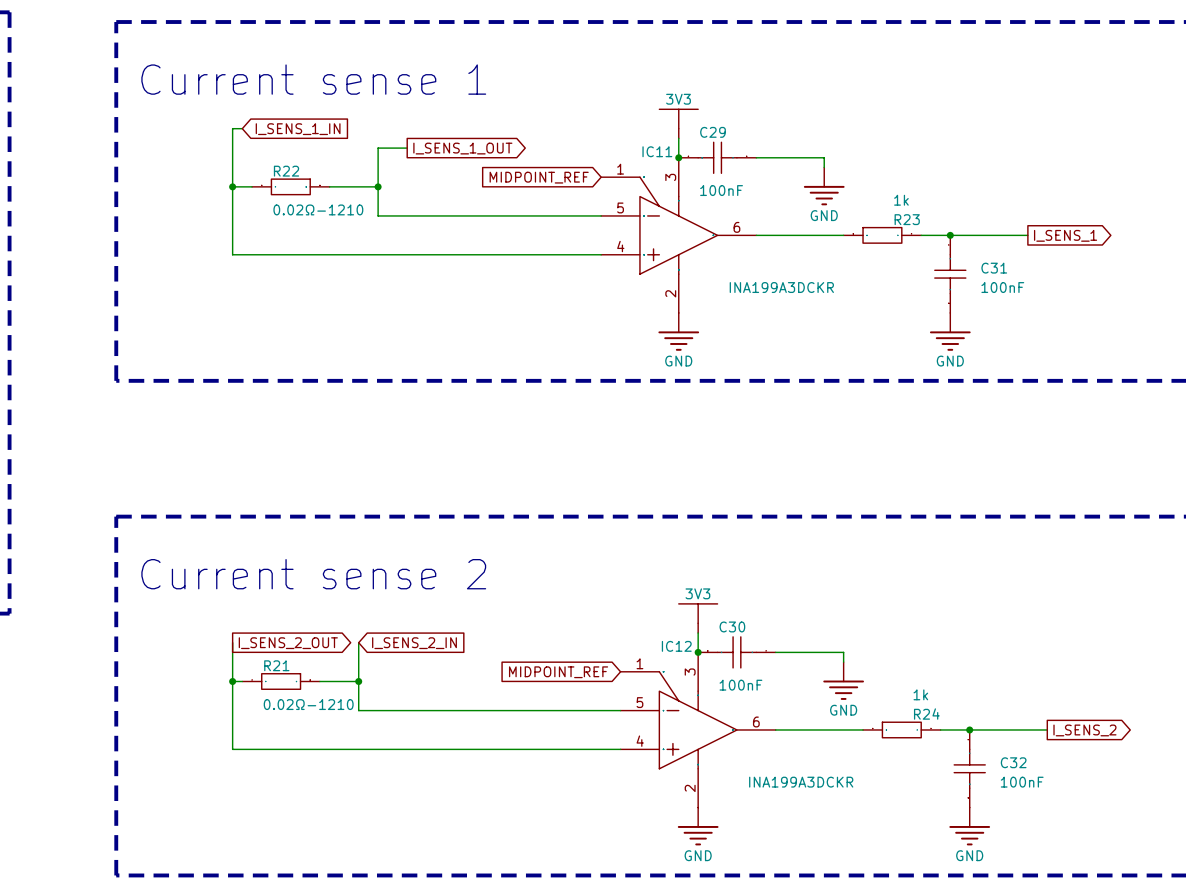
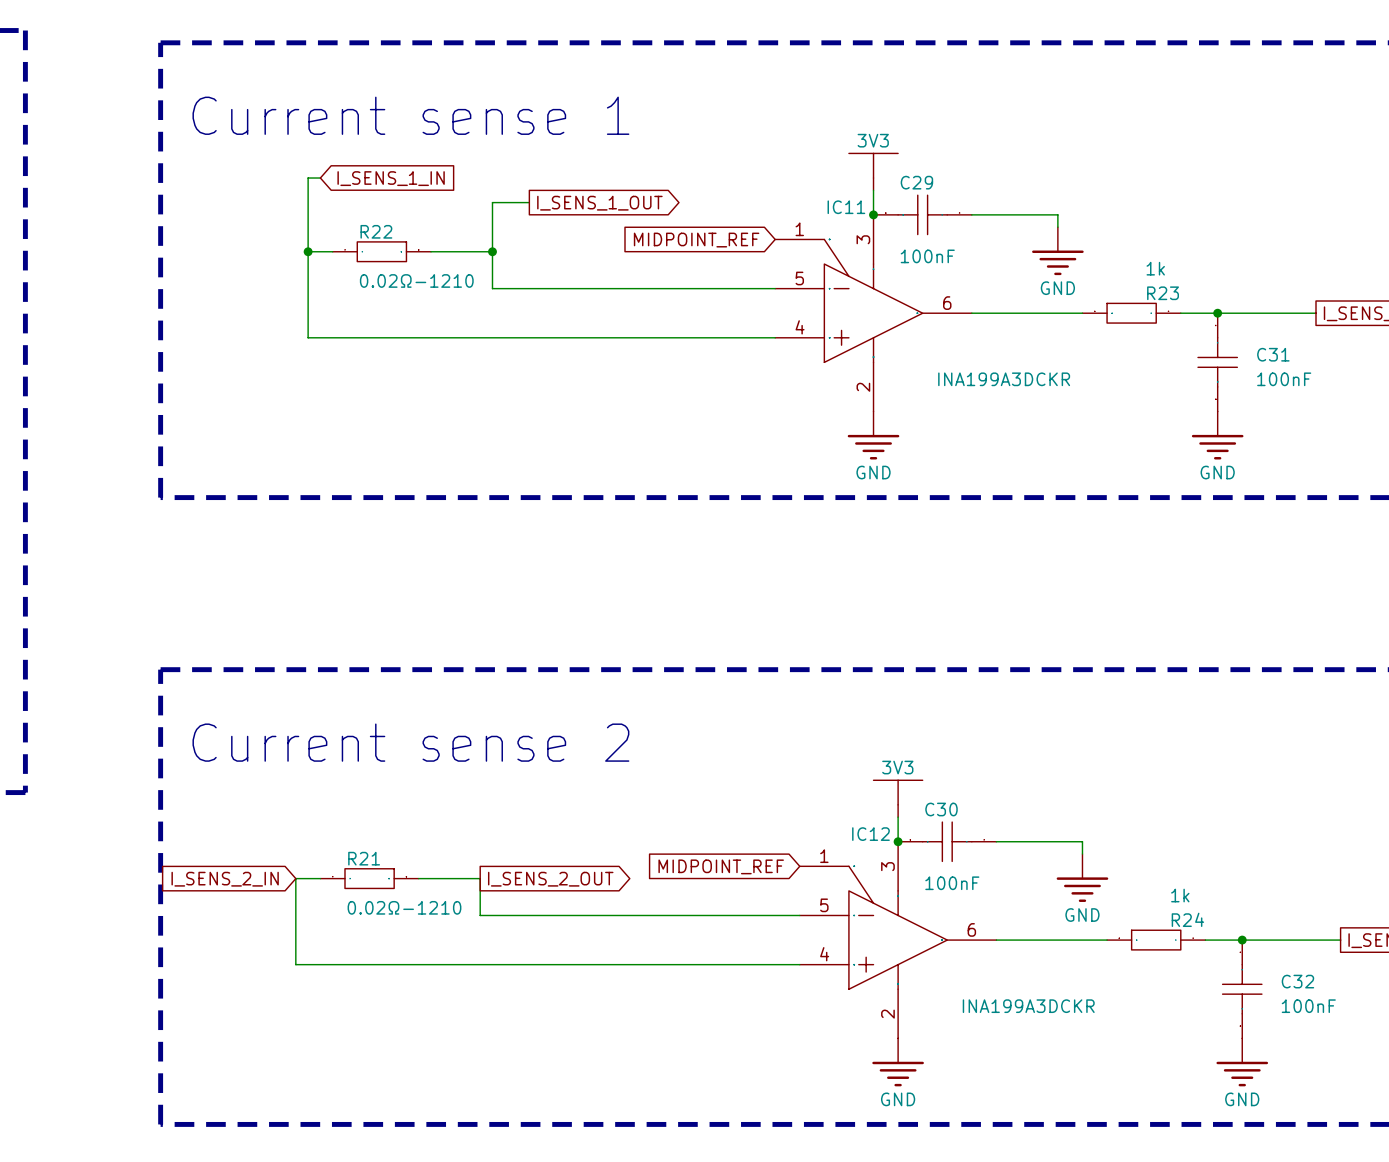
wire: (232, 642) (232, 749) -> (308, 878) (295, 878) (295, 964) (308, 964)
wire: (358, 642) (358, 710) (368, 710) -> (467, 878) (480, 878) (480, 915)
global label position: I_SENS_2_OUT (288, 643) -> I_SENS_2_OUT (550, 879)
global label rotation: 0° (414, 643) -> 180° (225, 879)
global label position: I_SENS_2_IN (414, 643) -> I_SENS_2_IN (225, 879)
junction: (232, 681) -> none
junction: (358, 681) -> none

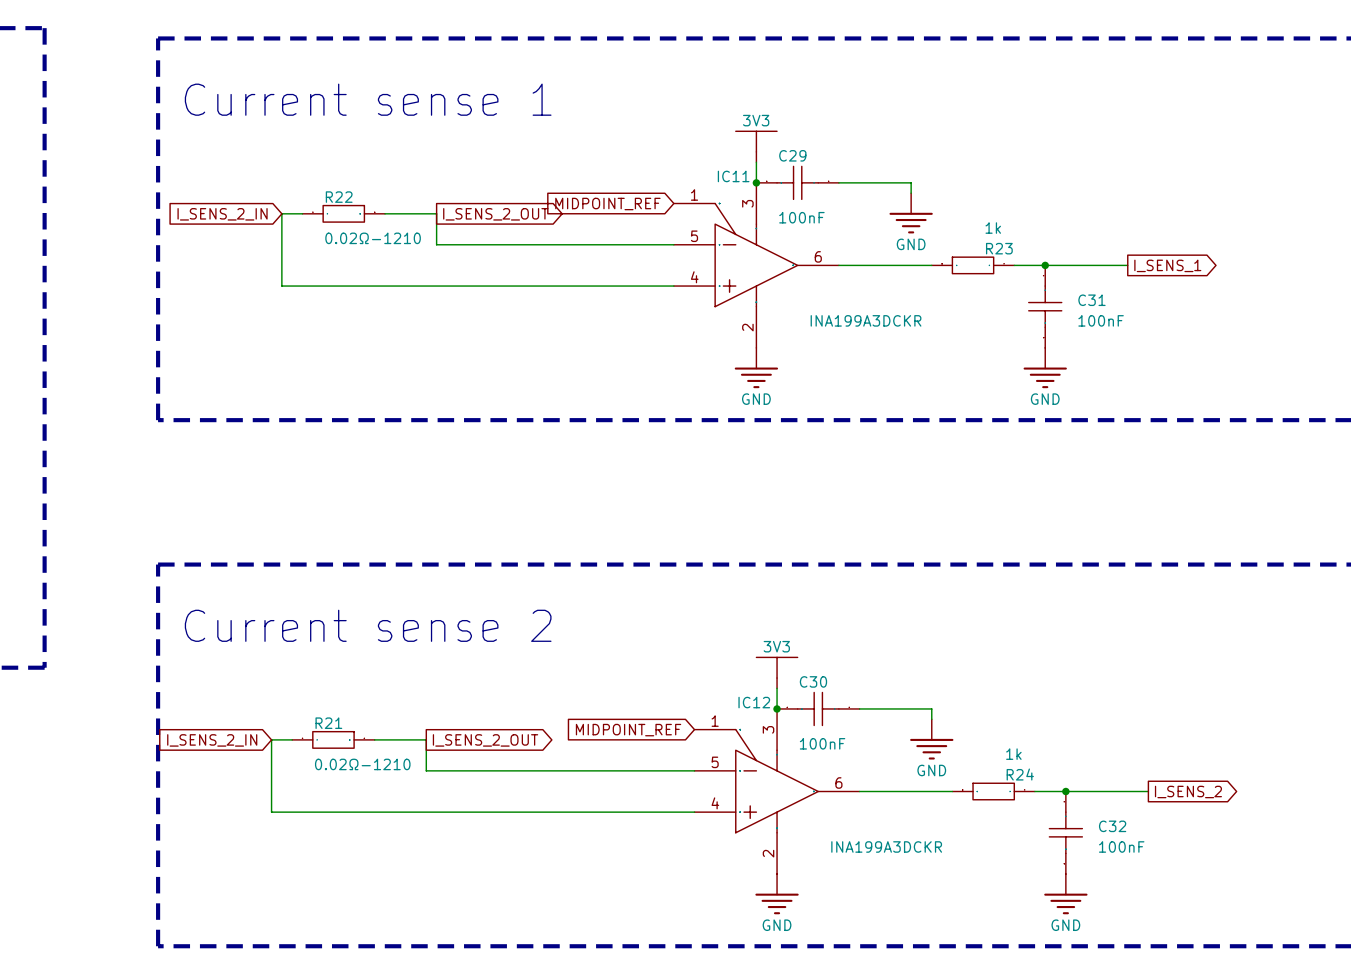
wire: (320, 178) (308, 178) (308, 251) -> none
global label: I_SENS_1_IN (391, 178) -> none
wire: (529, 202) (492, 202) (492, 251) -> none
global label: I_SENS_1_OUT (599, 203) -> none
junction: (308, 251) -> none
junction: (492, 251) -> none
global label: none -> I_SENS_2_IN (222, 214)
global label: none -> I_SENS_2_OUT (495, 214)

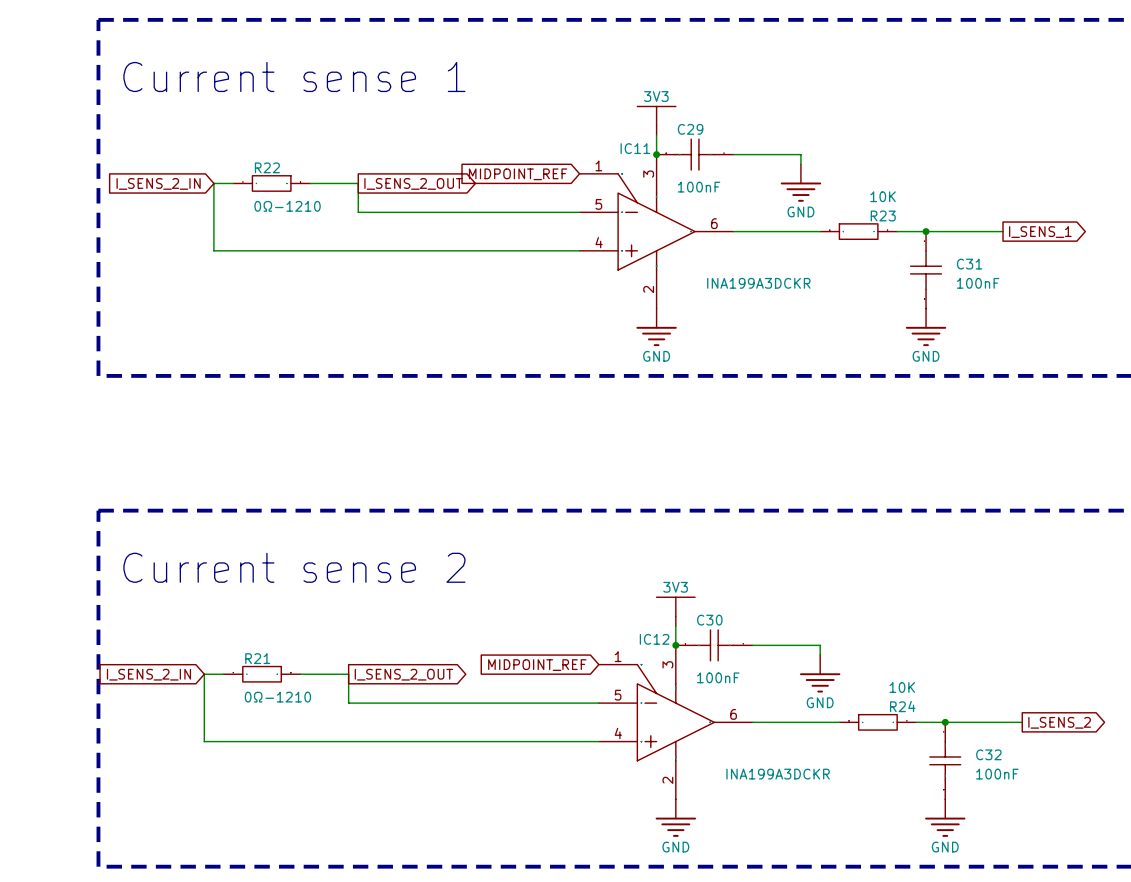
R23 value: 1k (993, 228) -> 10K (883, 196)
R22 value: 0.02Ω-1210 (373, 238) -> 0Ω-1210 (287, 206)
R24 value: 1k (1013, 754) -> 10K (902, 687)
R21 value: 0.02Ω-1210 (362, 764) -> 0Ω-1210 (277, 697)

